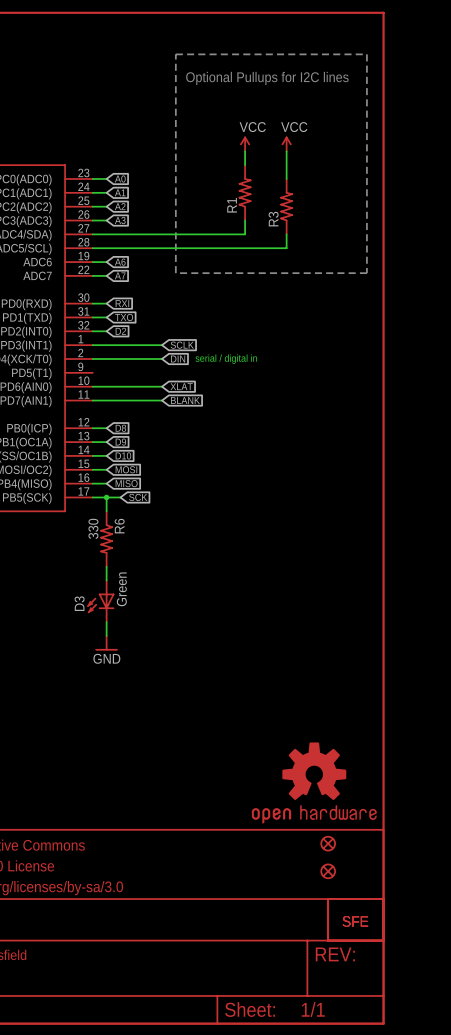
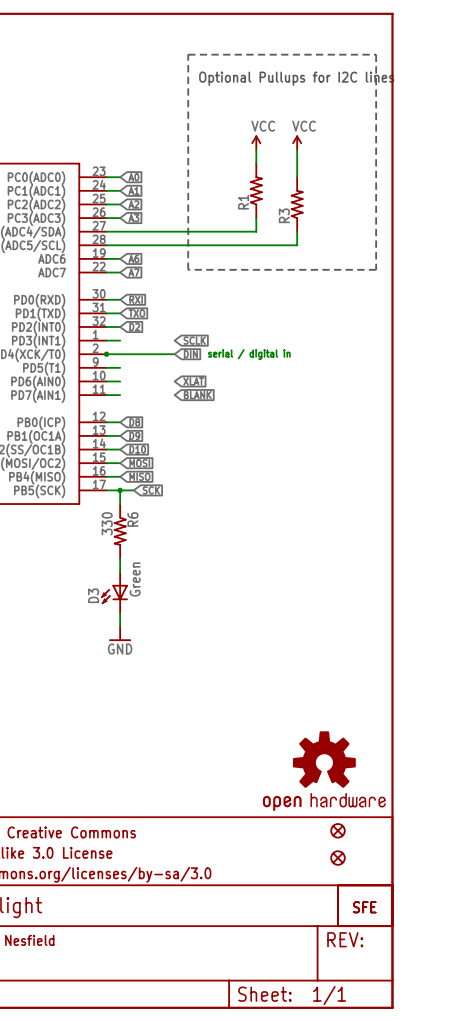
wire: (106, 345) (162, 345) -> none
junction: none -> (106, 354)
wire: none -> (106, 367) (120, 367)
wire: (106, 386) (162, 386) -> none
wire: (106, 400) (162, 400) -> none

